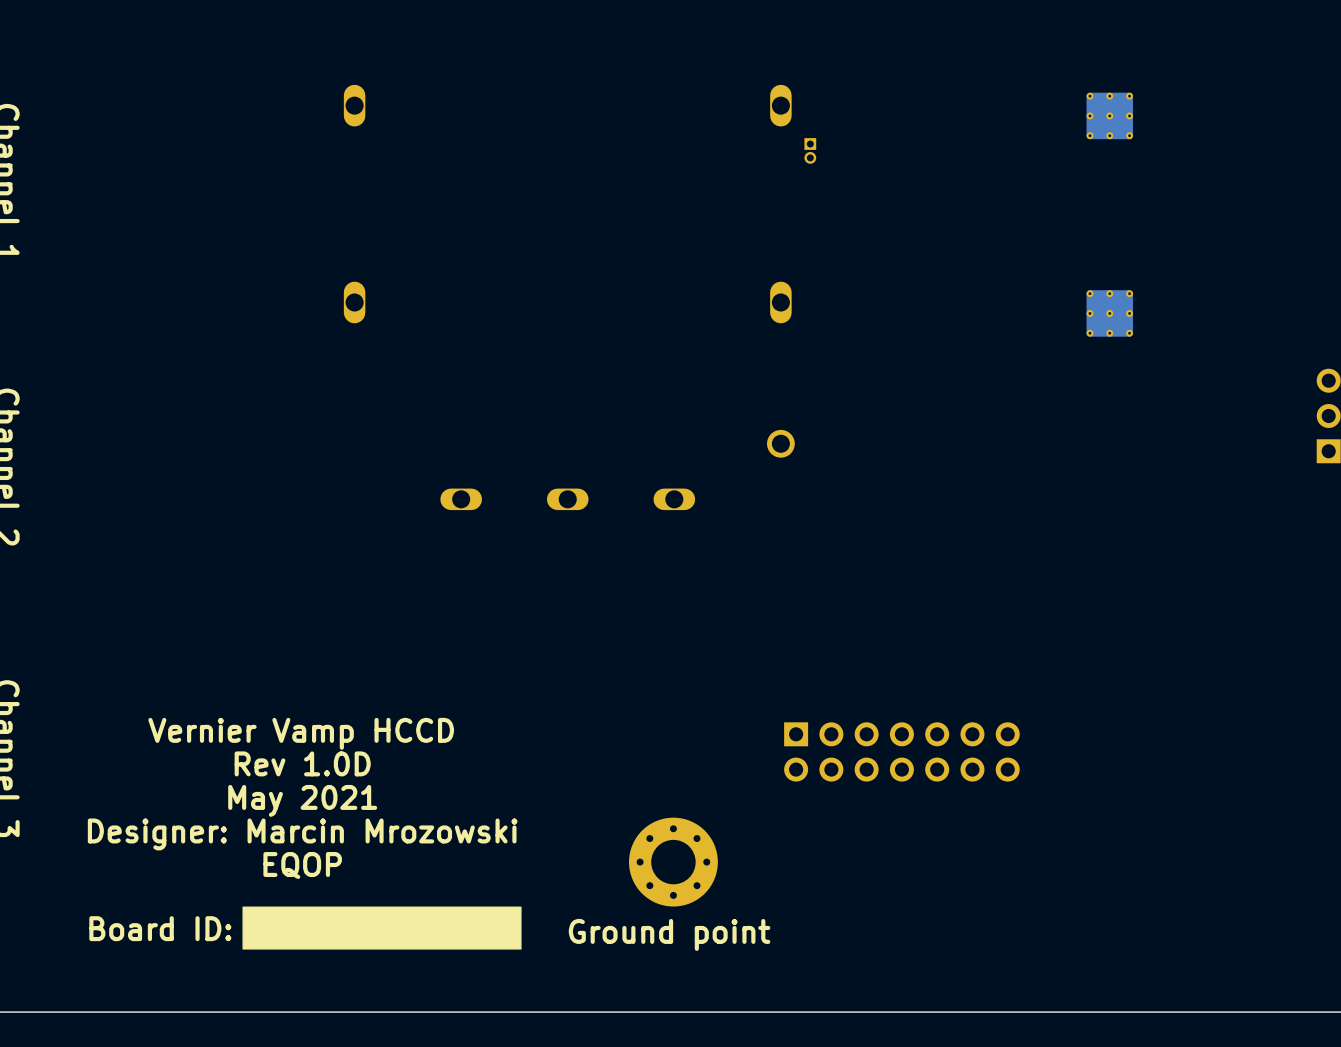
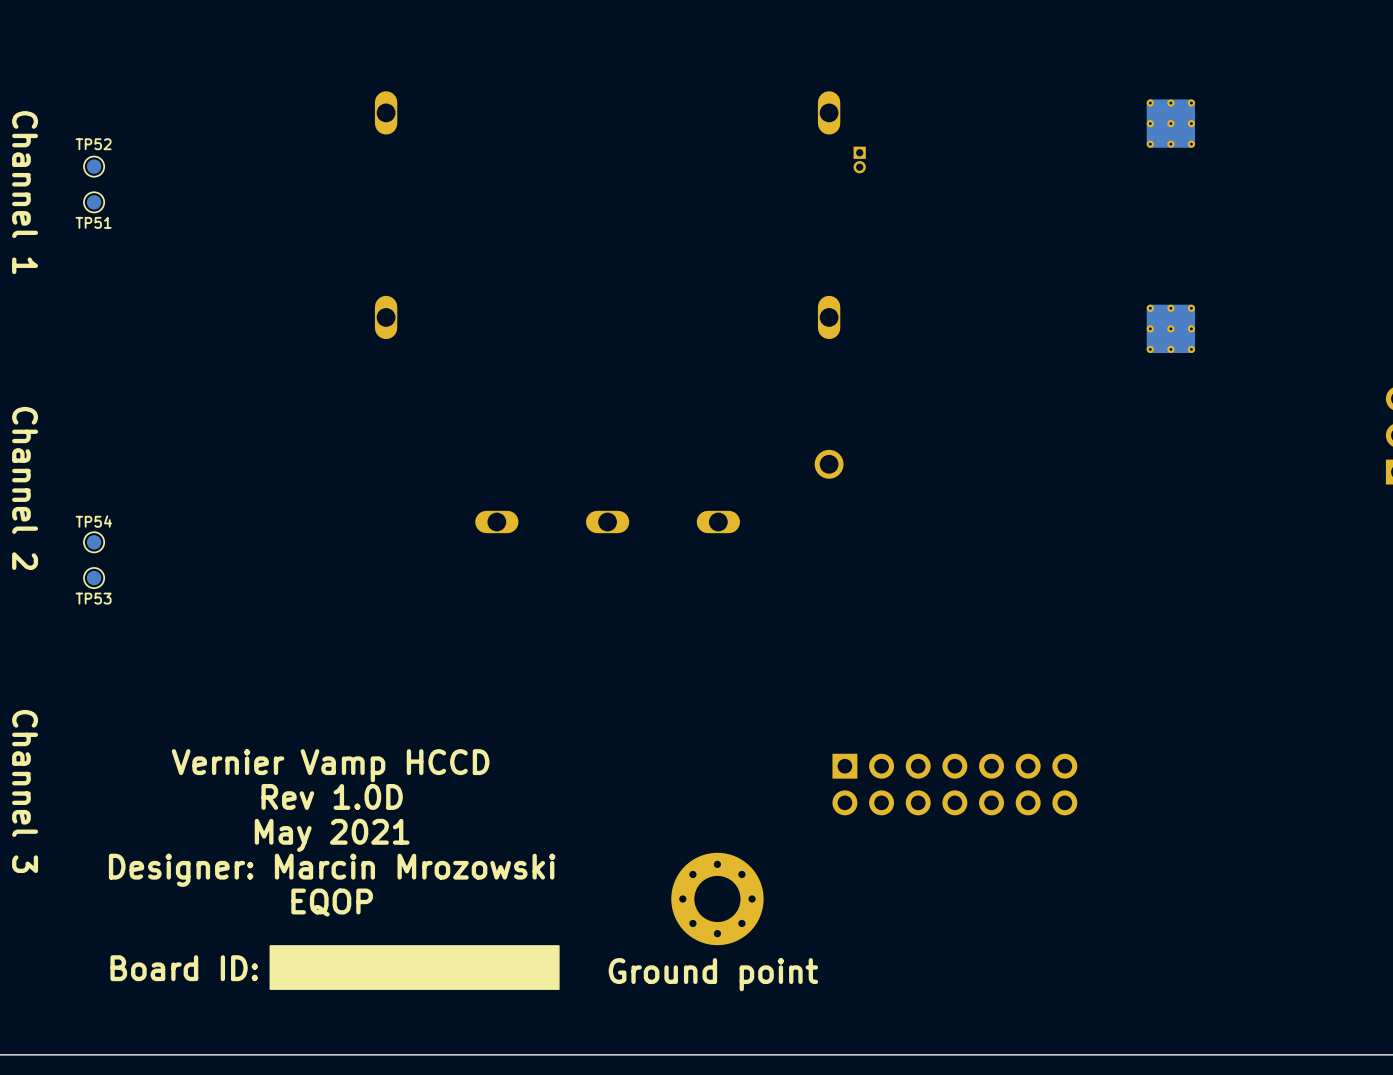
TP52: none -> (94, 166)
TP51: none -> (94, 202)
TP54: none -> (94, 542)
TP53: none -> (94, 578)

